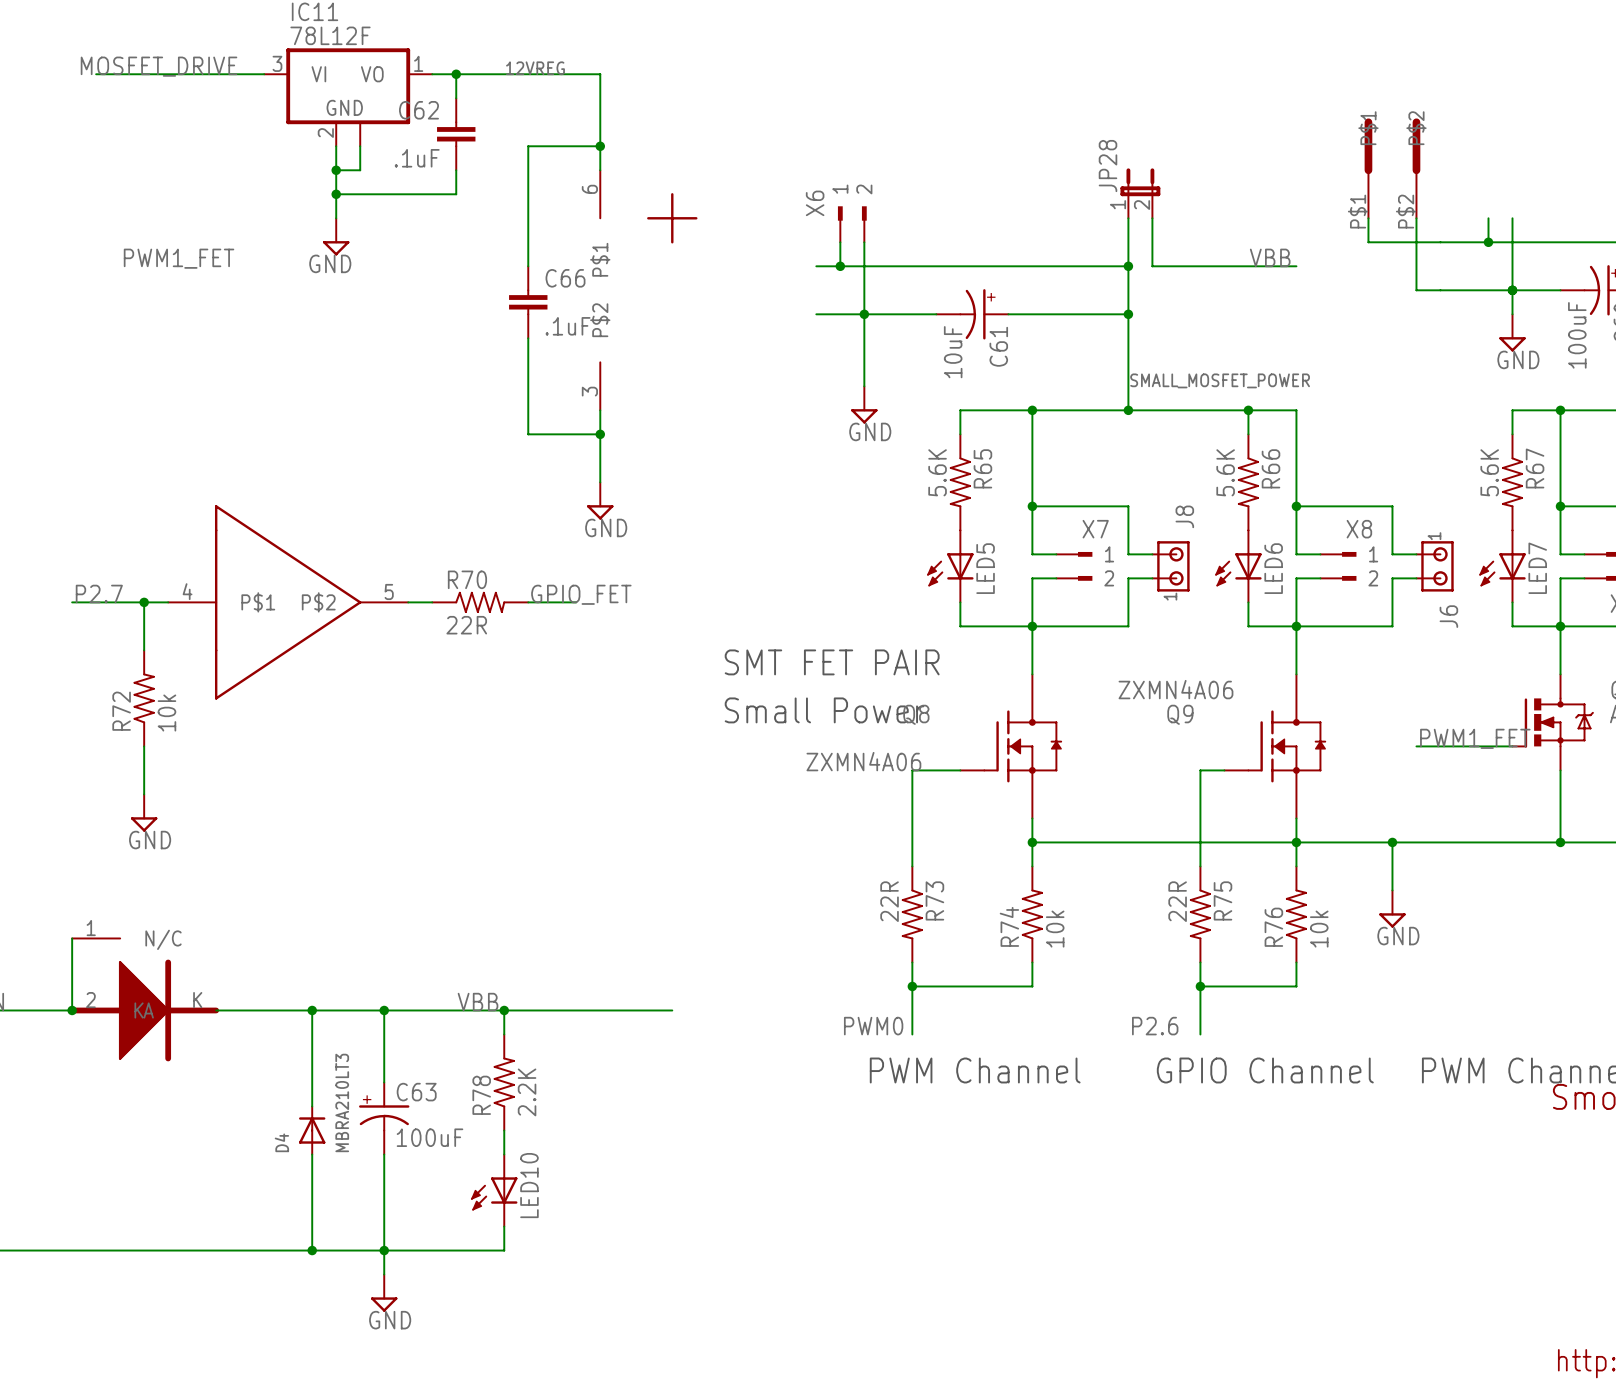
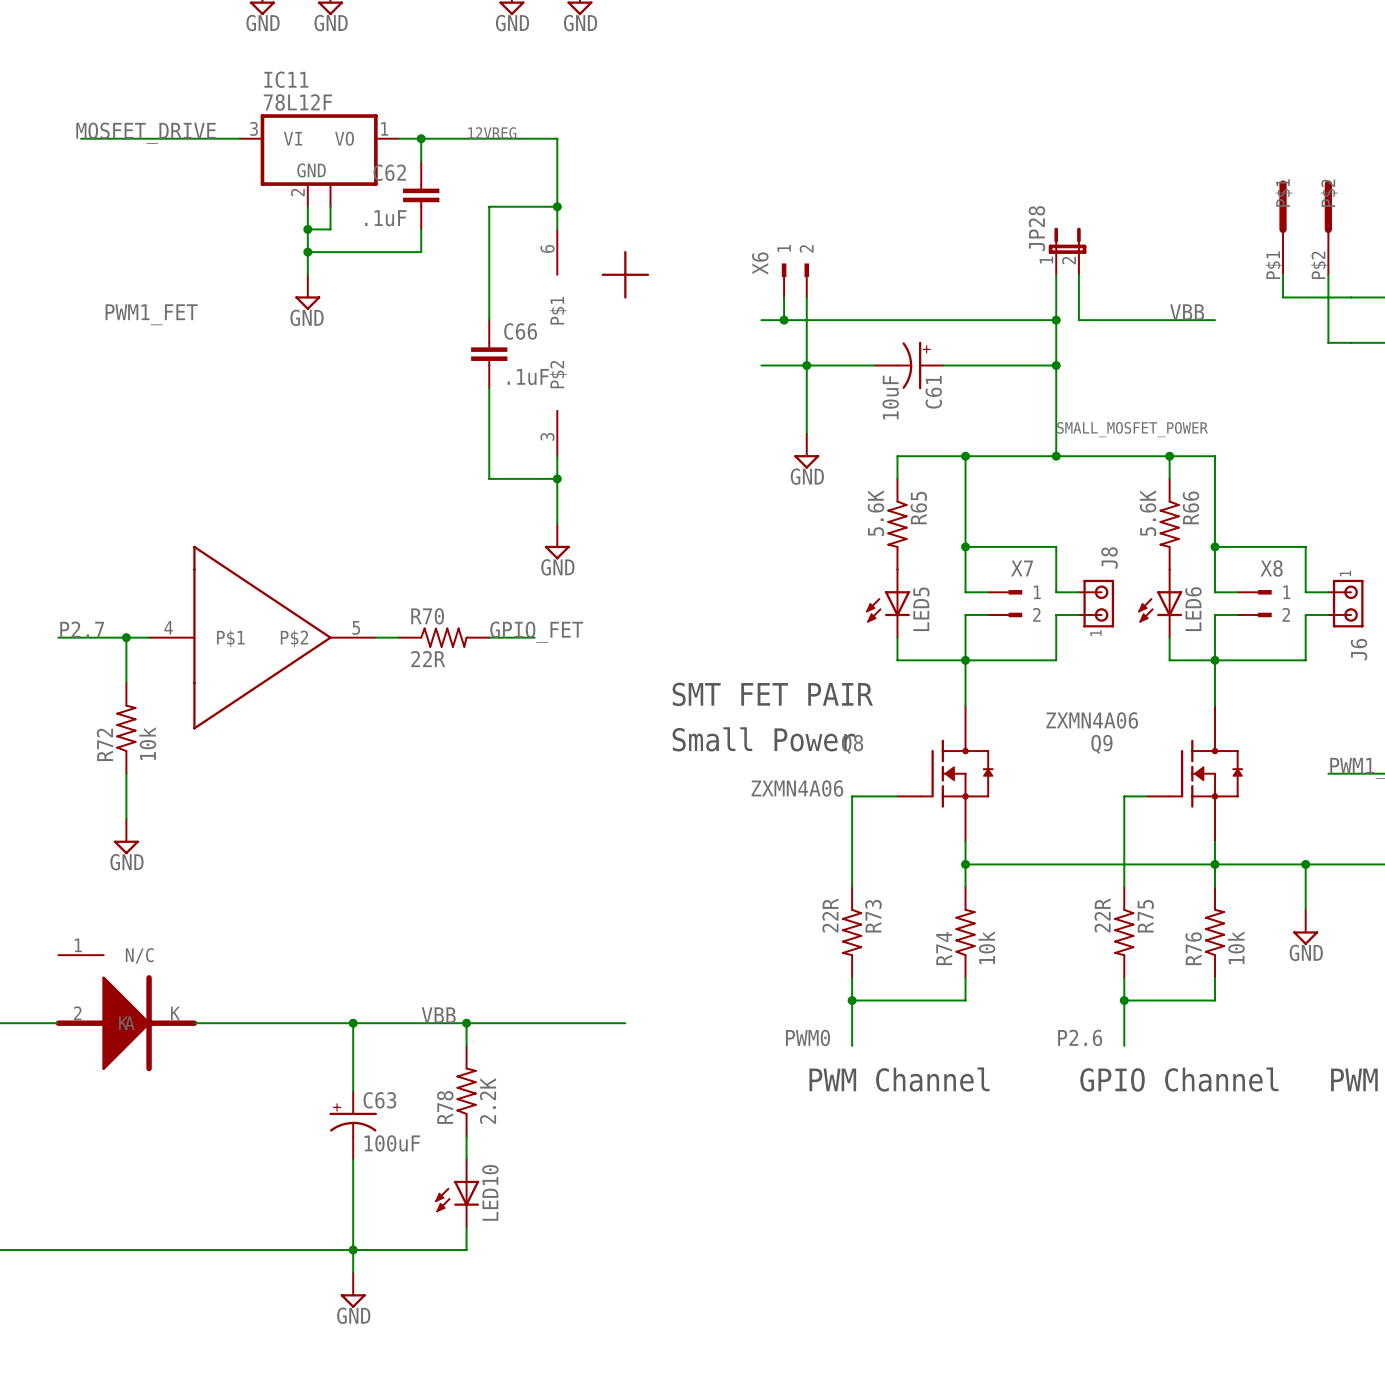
wire: (72, 938) (72, 1010) -> none
junction: (72, 1010) -> none
wire: (312, 1010) (312, 1106) -> none
junction: (312, 1010) -> none
D4: MBRA210LT3 (312, 1130) -> none
wire: (312, 1154) (312, 1250) -> none
junction: (312, 1250) -> none

